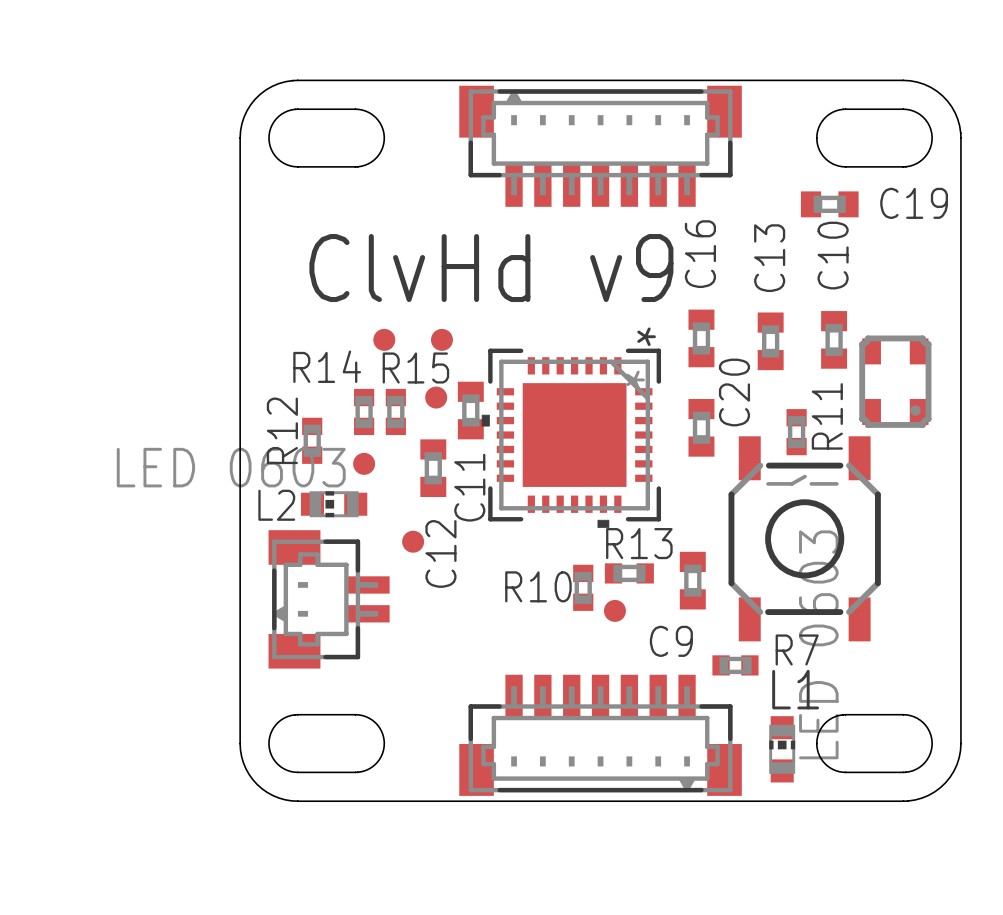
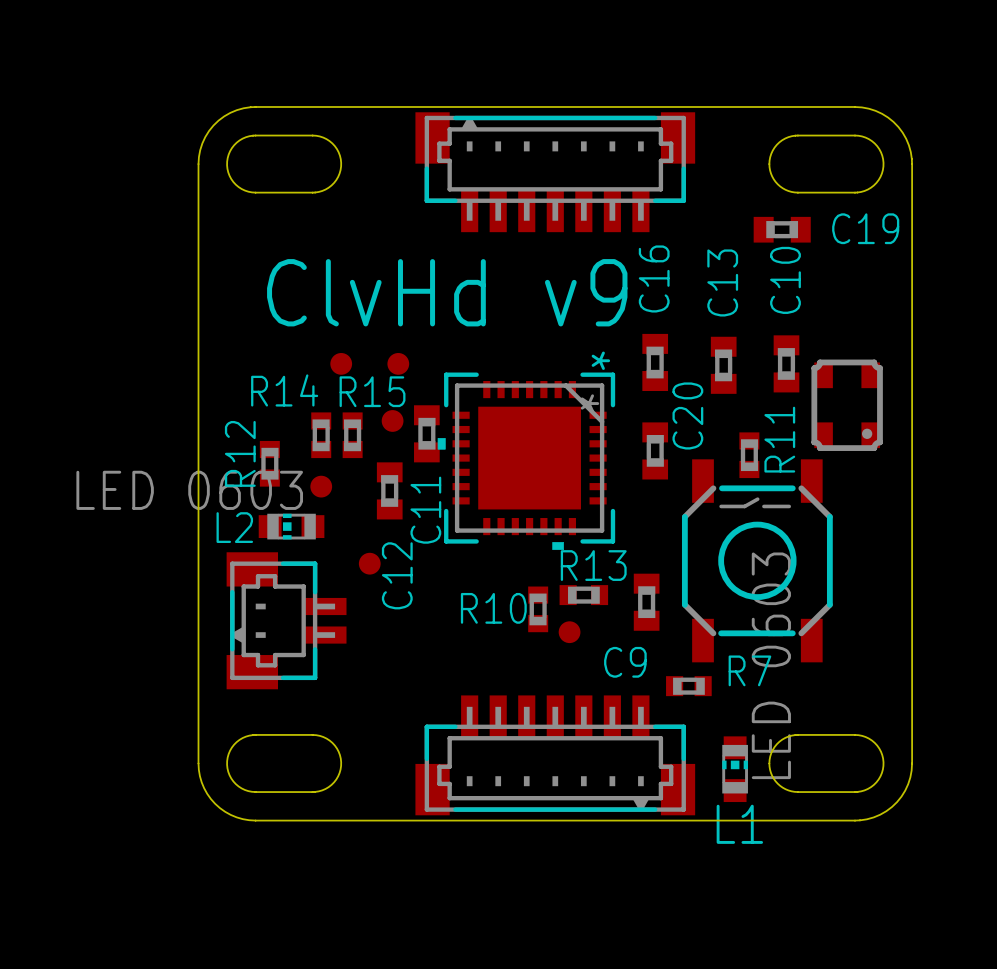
L1 name position: L1 (795, 689) -> L1 (739, 824)

